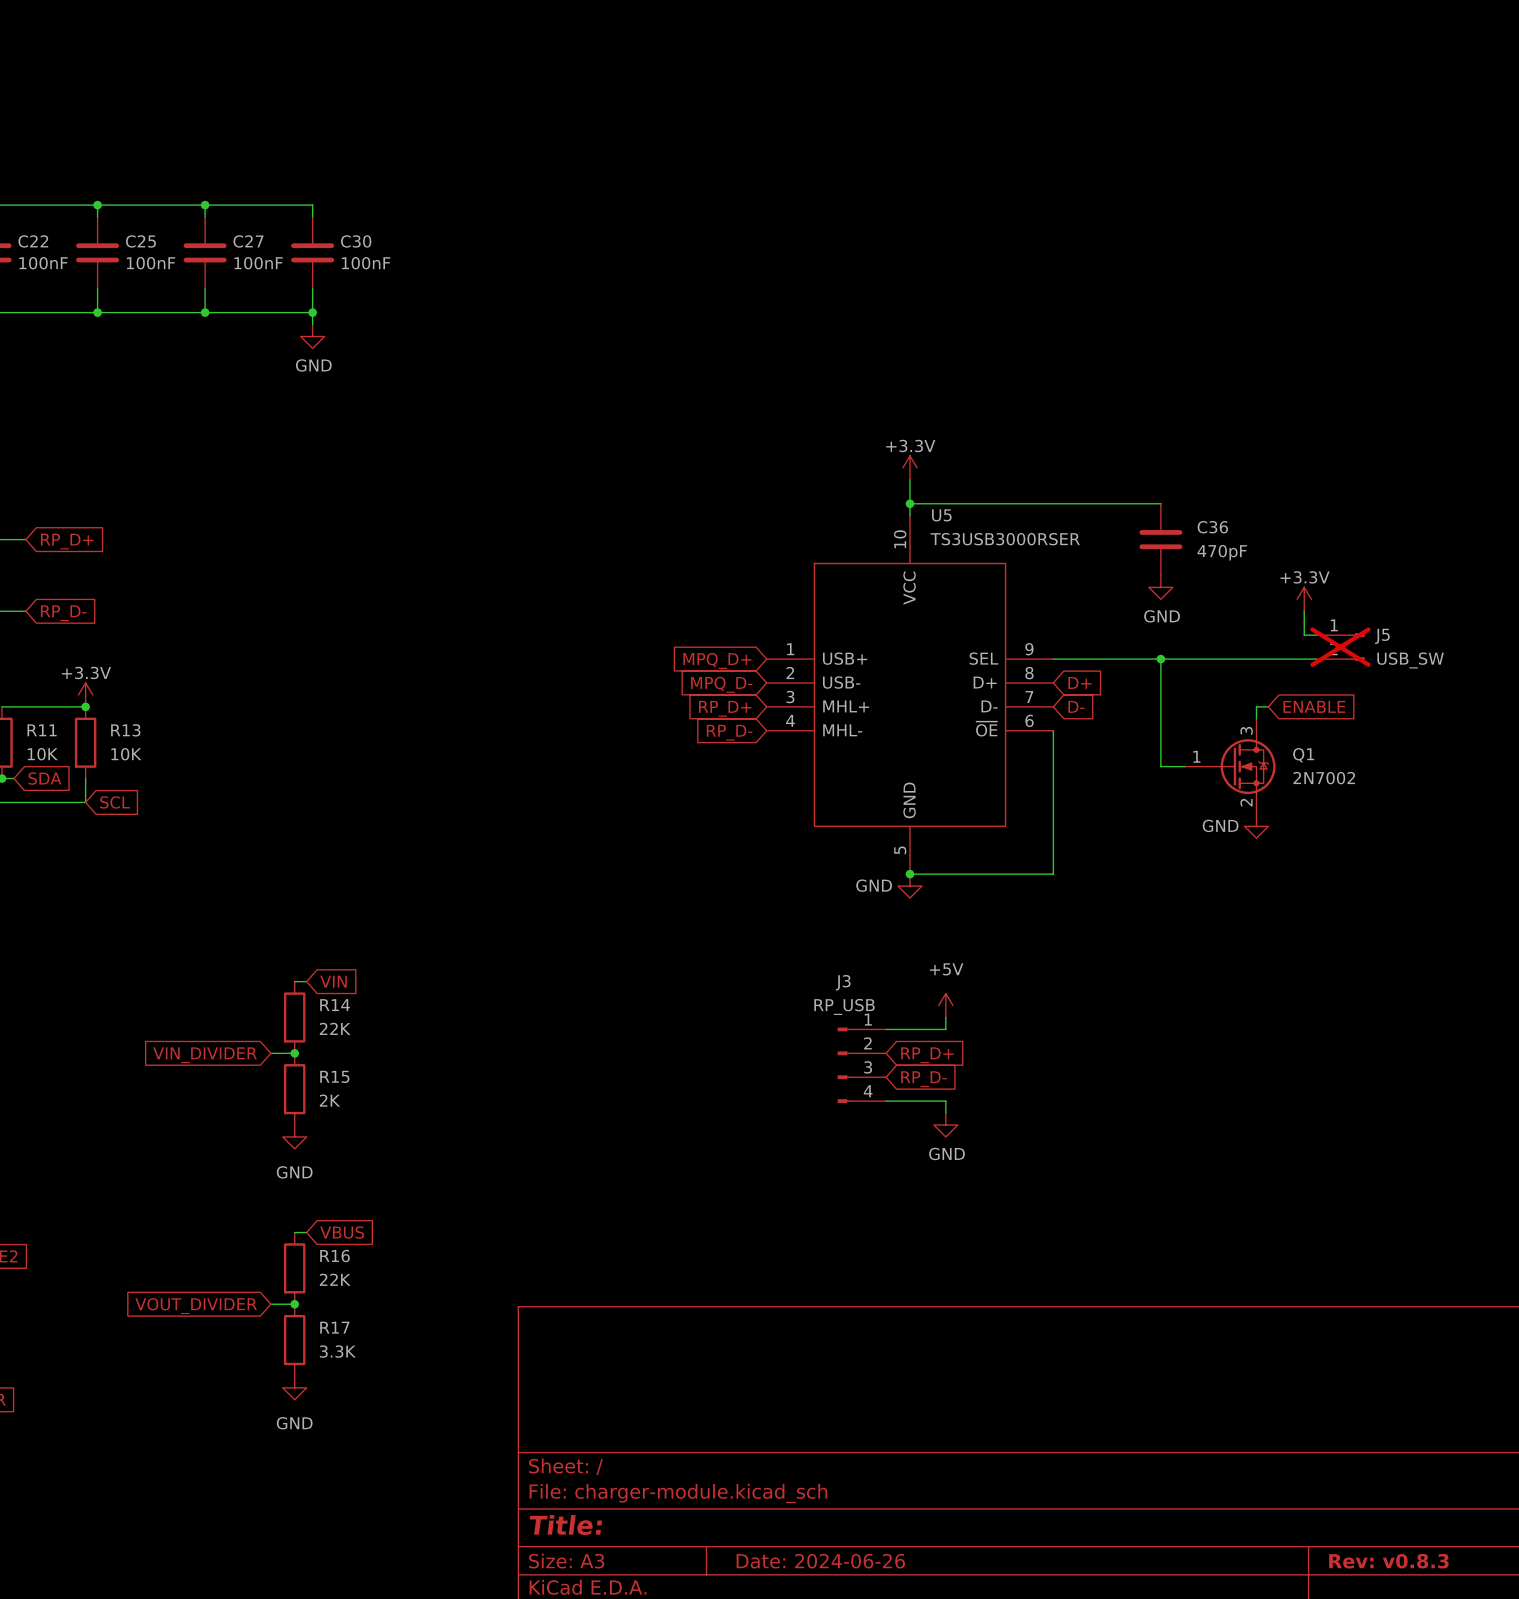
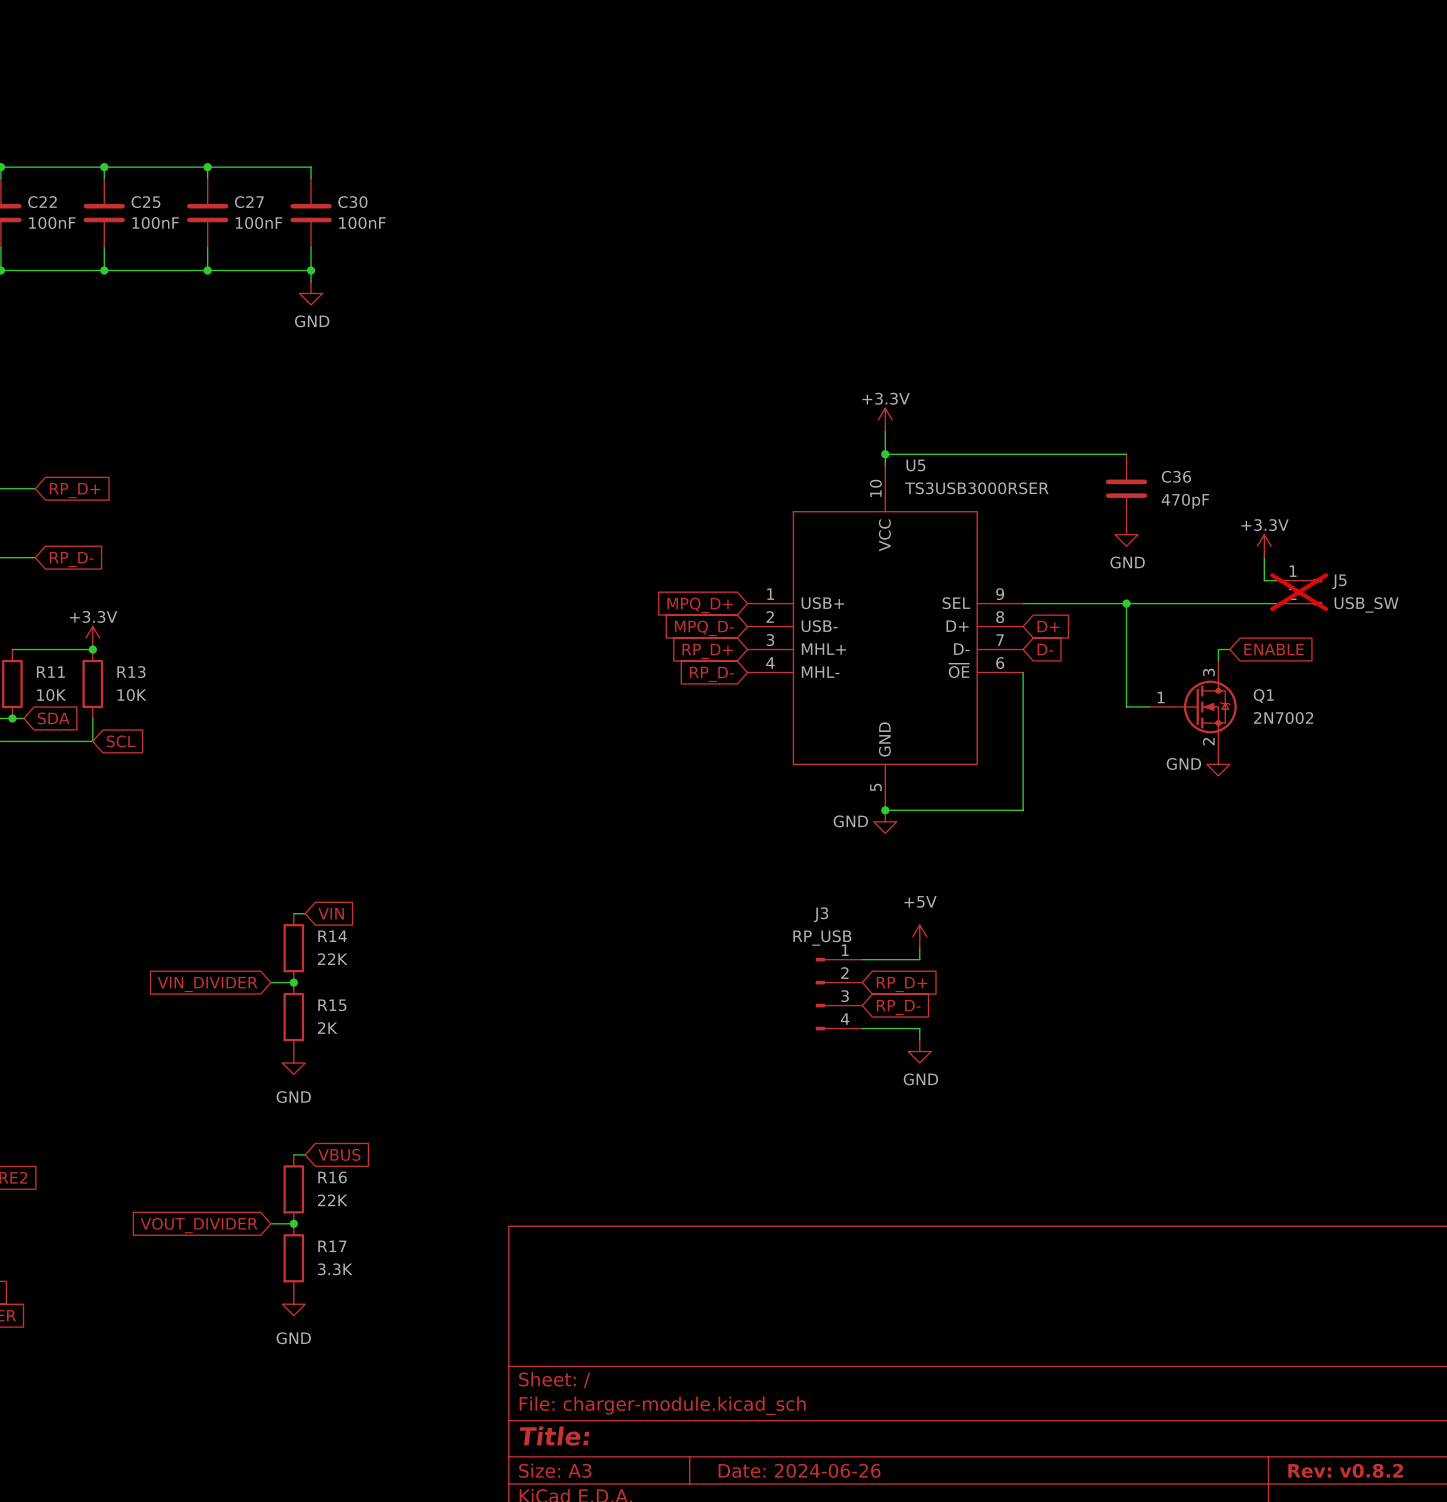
title block: Rev: v0.8.3 (1388, 1561) -> Rev: v0.8.2 (1345, 1470)

